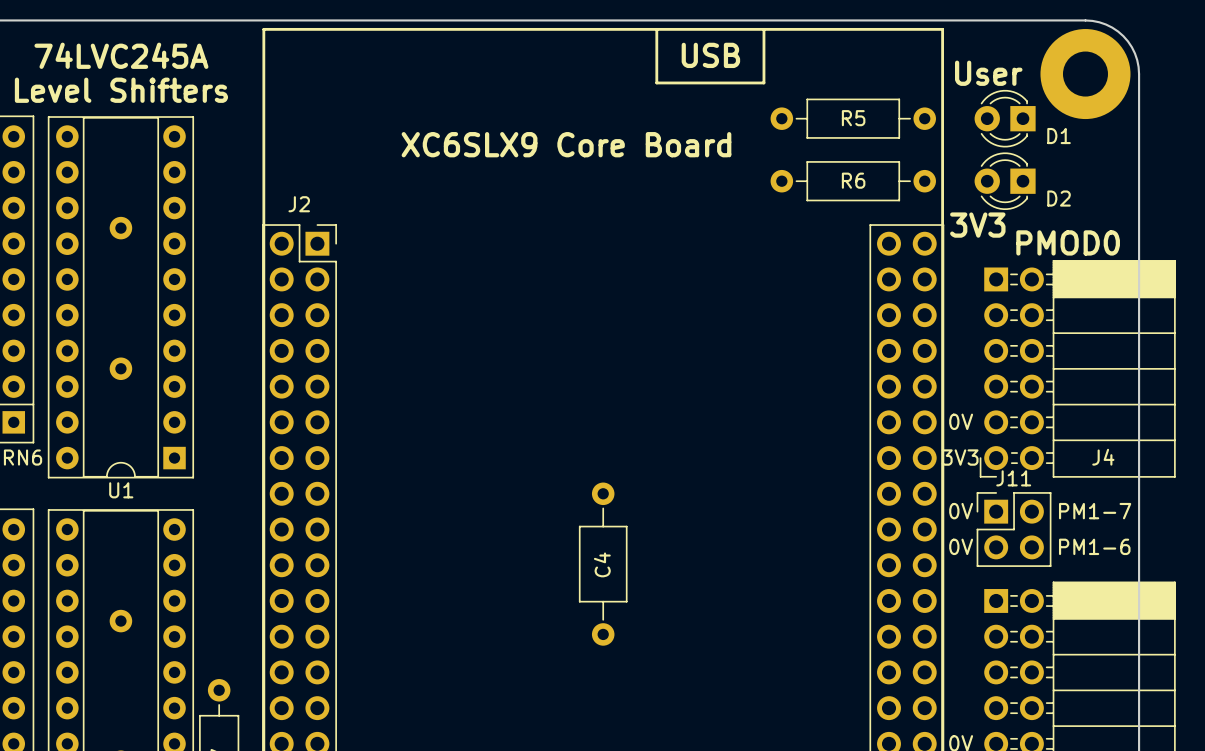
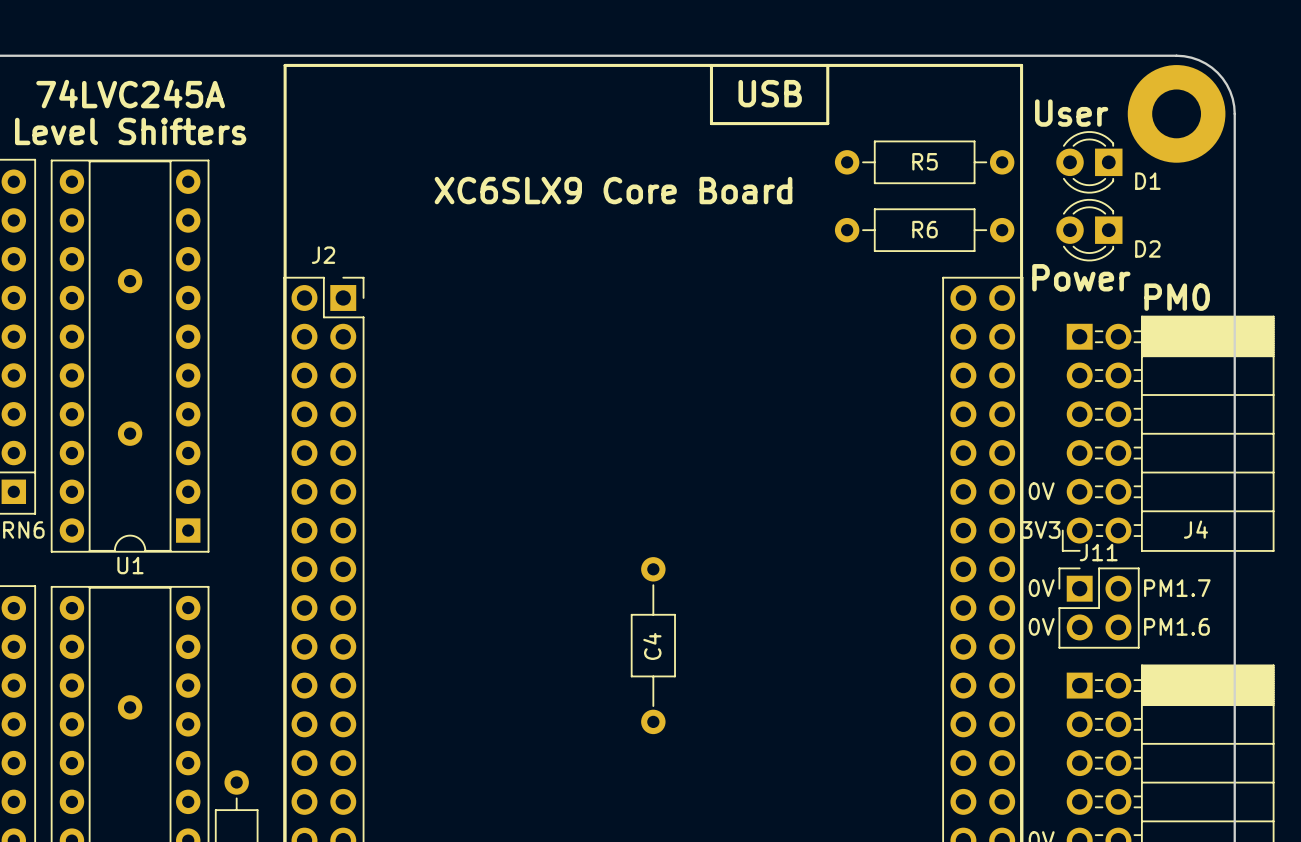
text: 3V3 (977, 225) -> none
text: none -> Power (1081, 277)
text: PMOD0 (1068, 242) -> PM0 (1177, 297)
C4 footprint: [578, 482, 628, 646] -> [630, 557, 676, 735]
text: PM1-7 (1095, 511) -> PM1.7 (1177, 588)
text: PM1-6 (1094, 546) -> PM1.6 (1176, 626)

